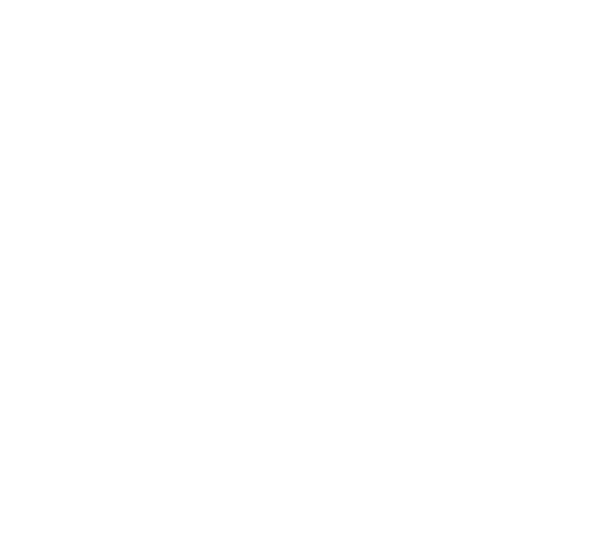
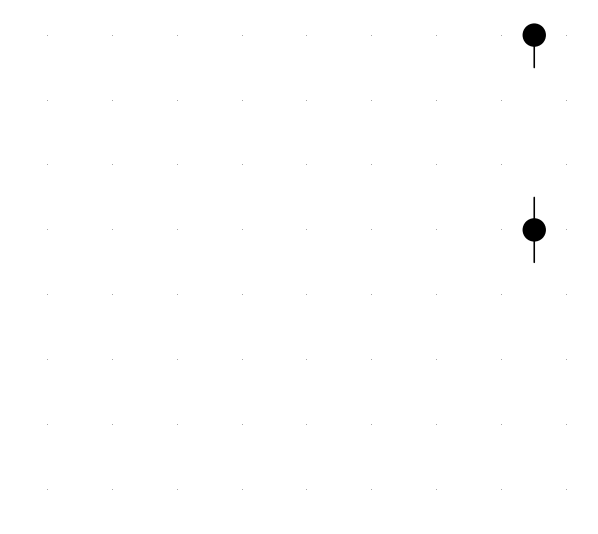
wire: none -> (534, 35) (534, 67)
junction: none -> (534, 35)
wire: none -> (534, 197) (534, 262)
junction: none -> (534, 229)

